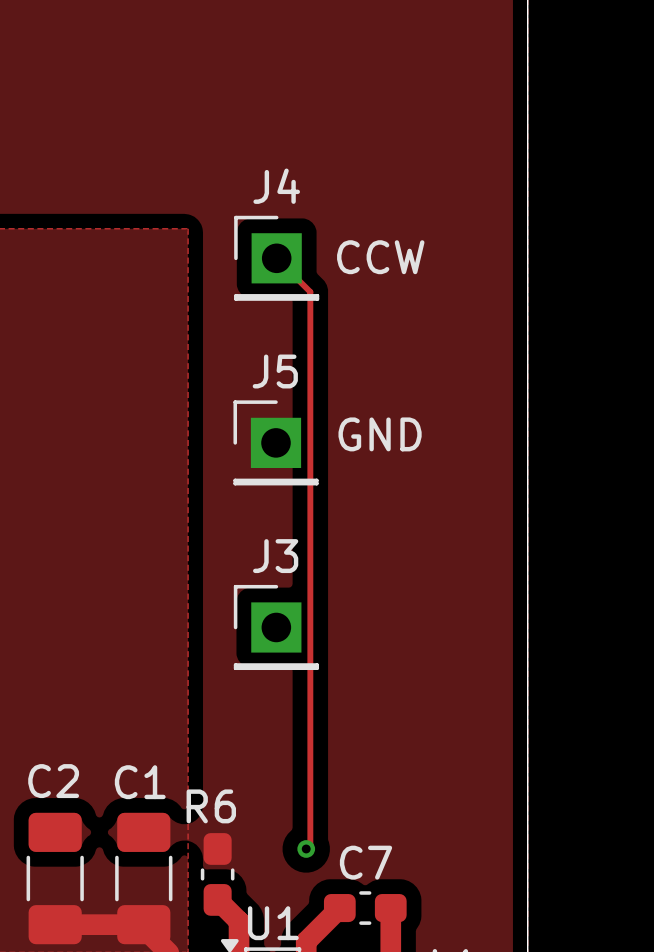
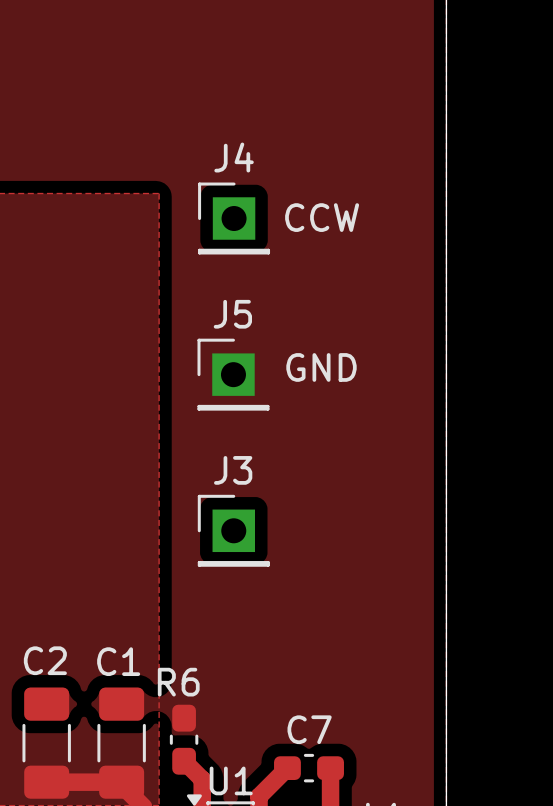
track: (276, 258) (310, 291) (310, 844) (306, 848) -> none
via: (306, 848) -> none

